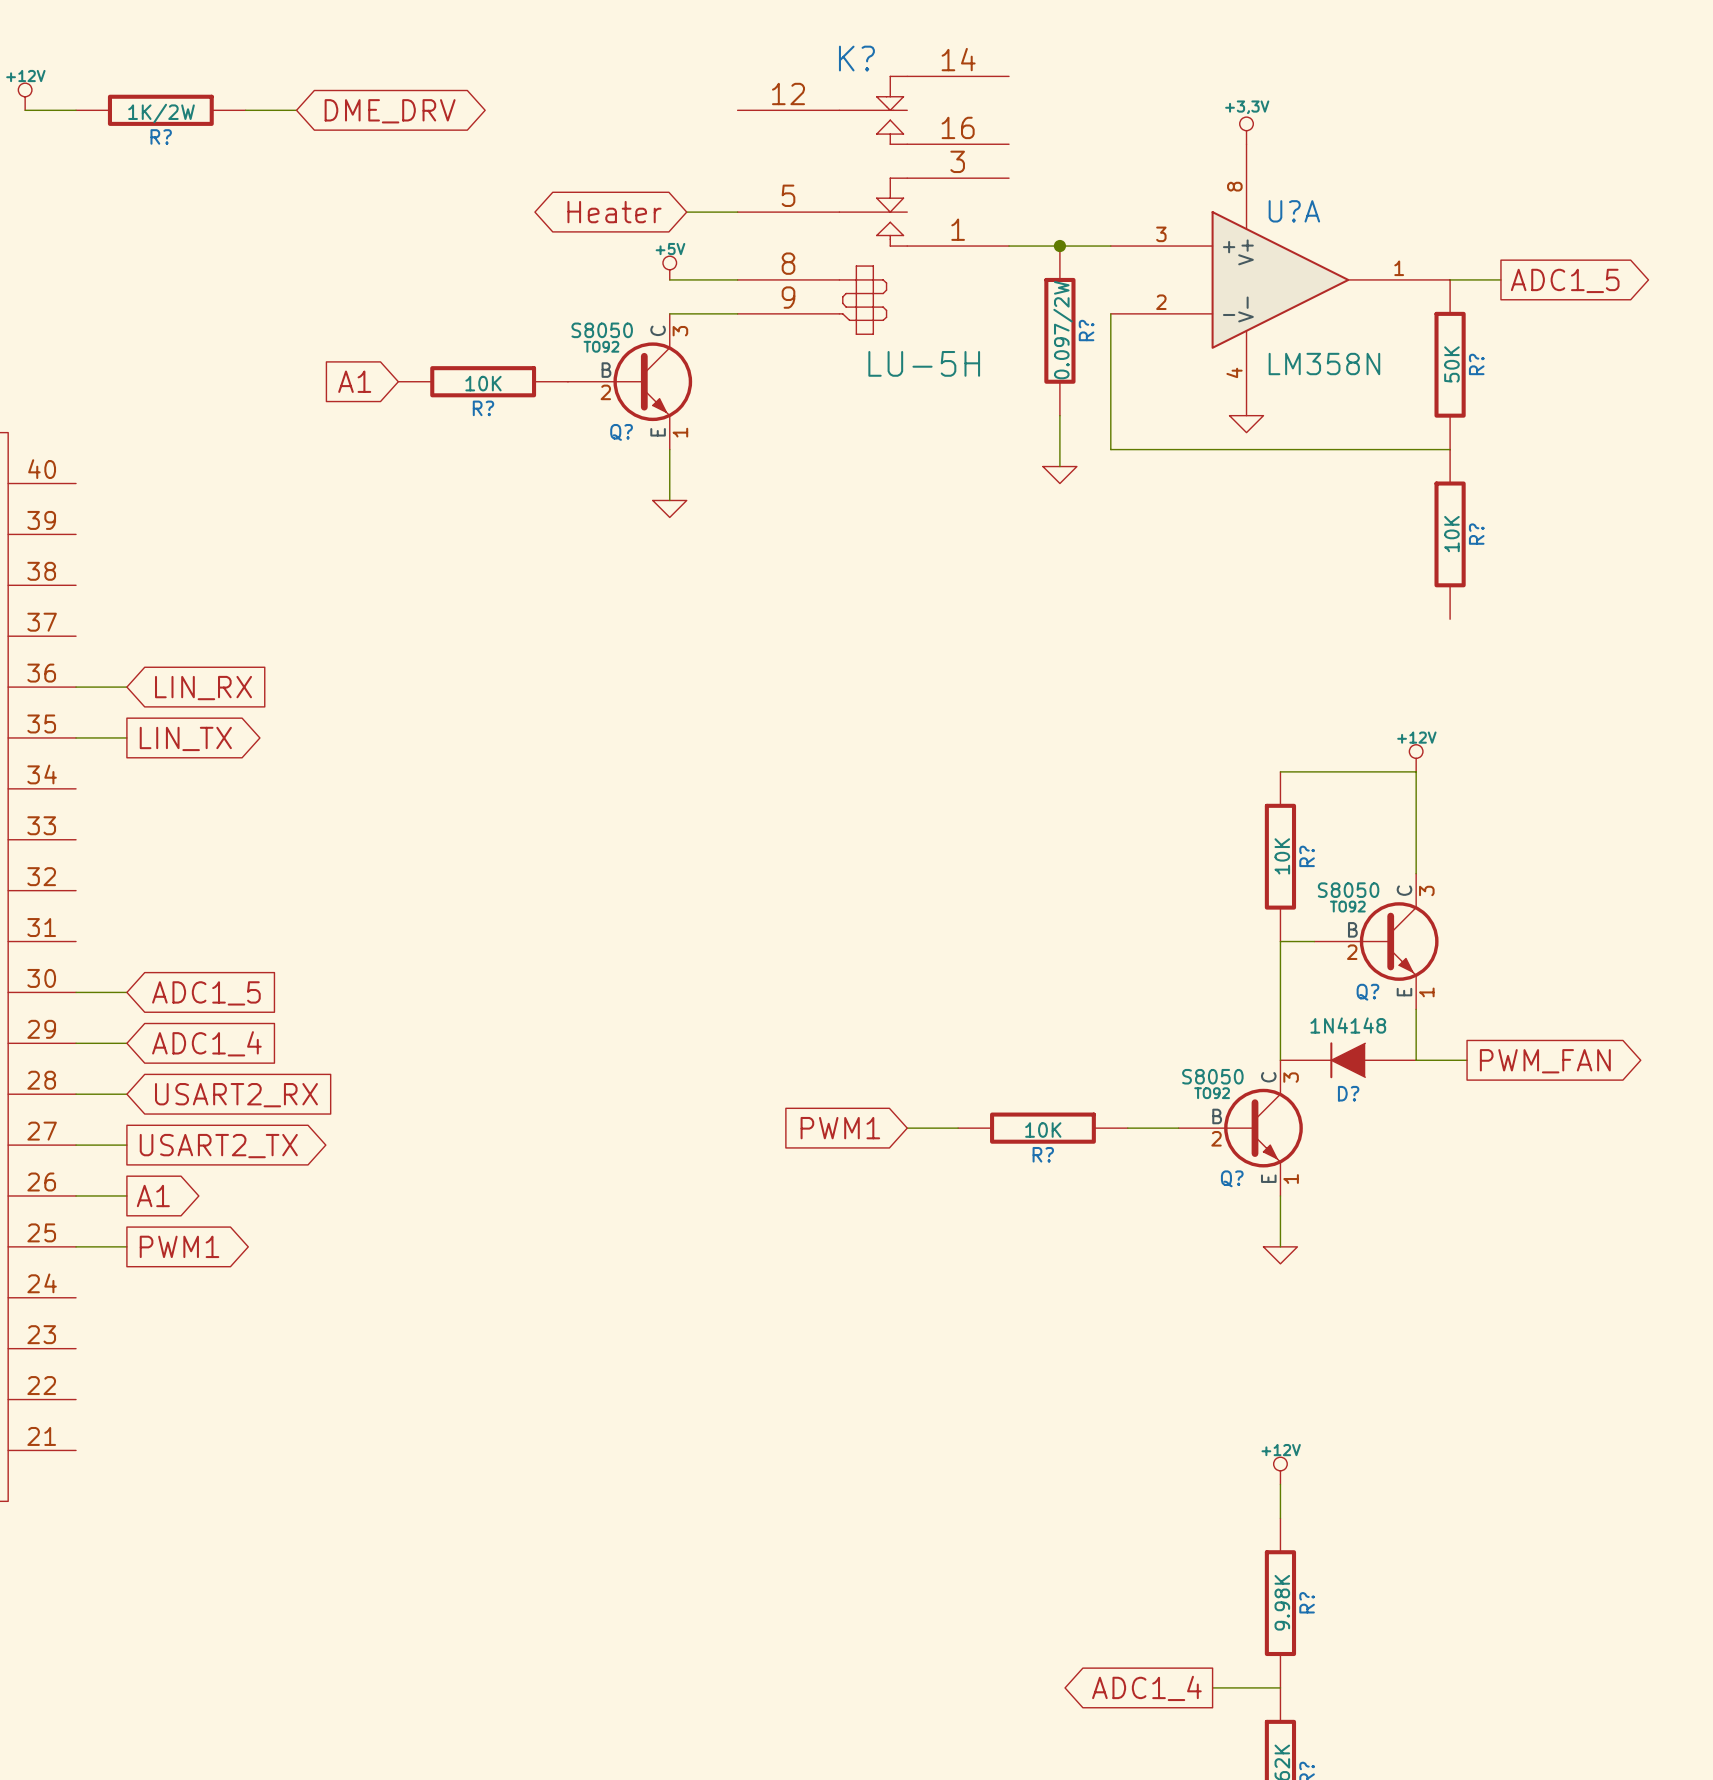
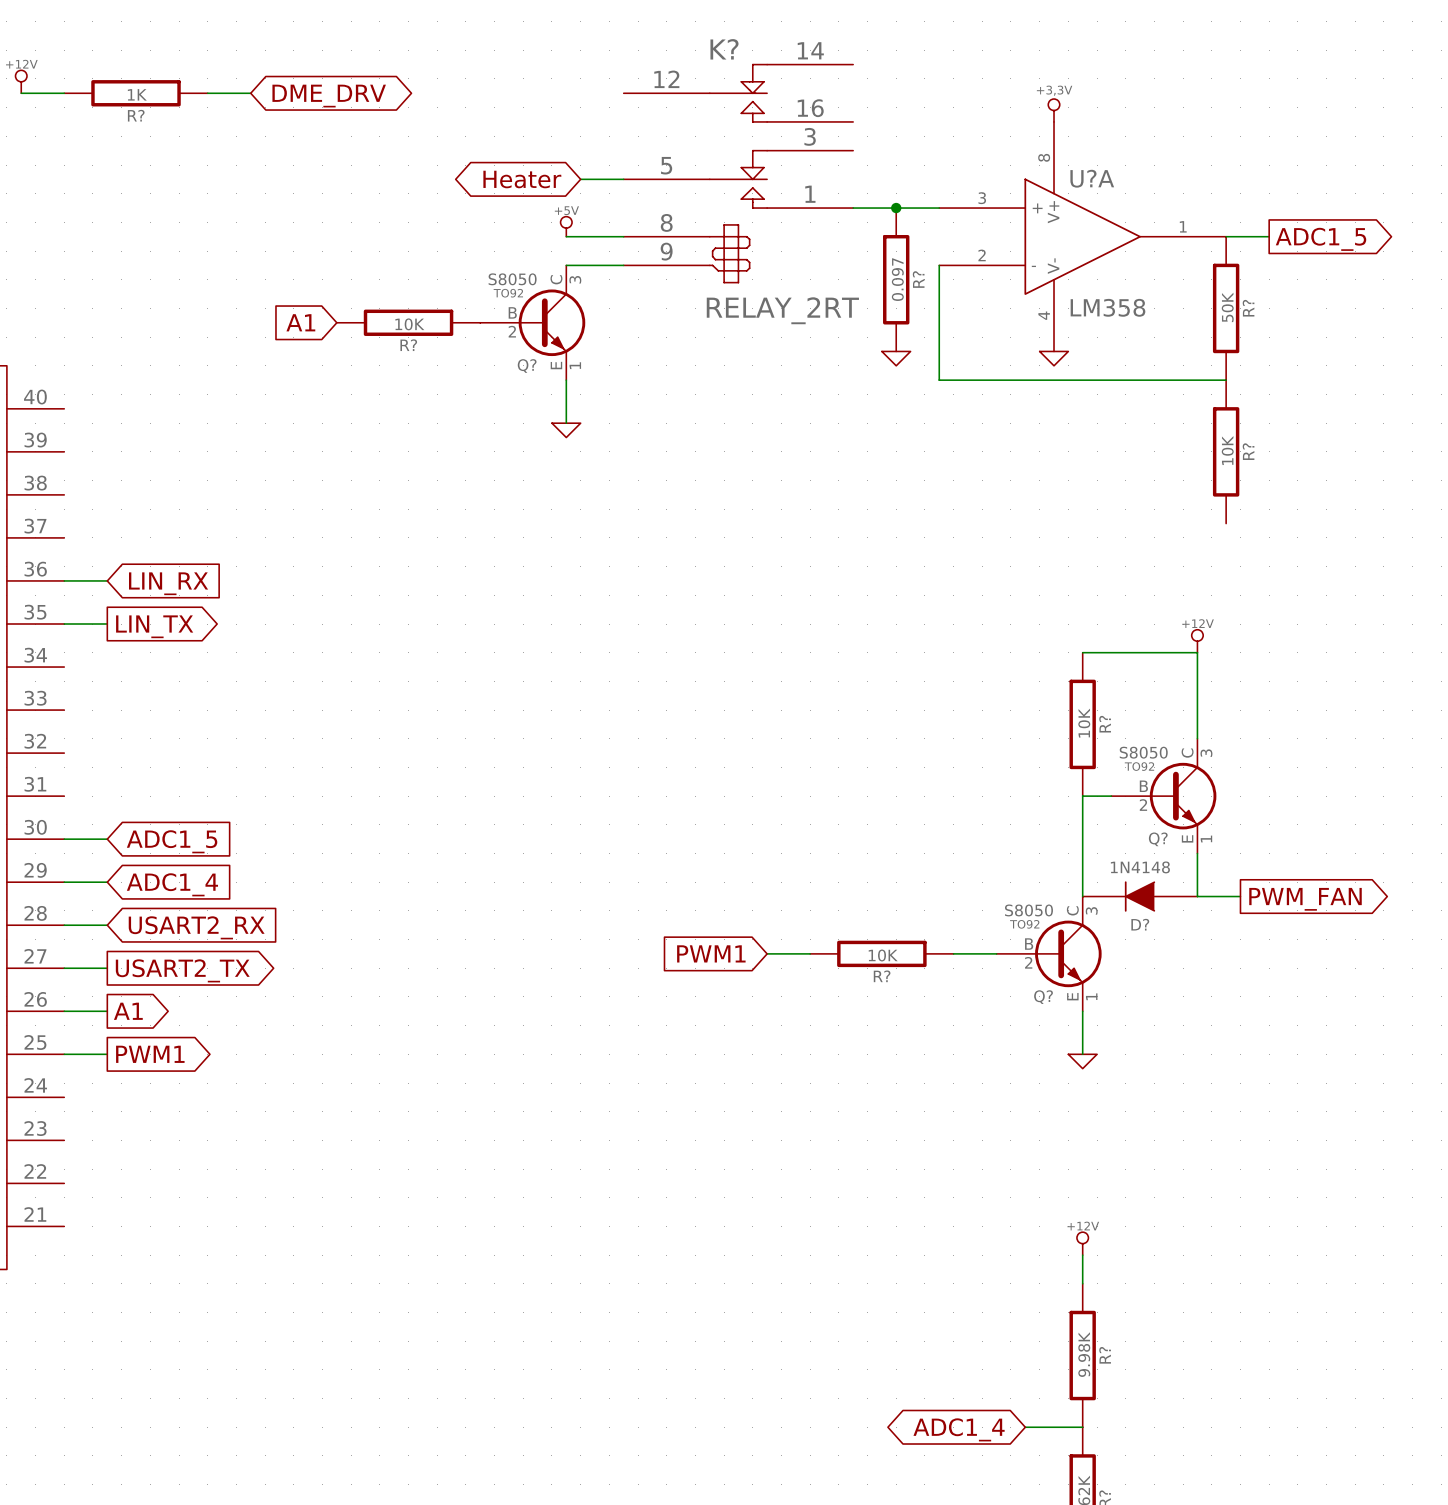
R? value: 1K/2W (161, 113) -> 1K (137, 94)
R? value: 0.097/2W (1063, 330) -> 0.097 (897, 279)
K? value: LU-5H (924, 363) -> RELAY_2RT (782, 310)
U?A value: LM358N (1324, 364) -> LM358 (1107, 307)
wire: (1059, 415) (1059, 466) -> none
power symbol position: (1059, 475) -> (896, 358)
global label shape: output (1146, 1688) -> bidirectional (959, 1429)

